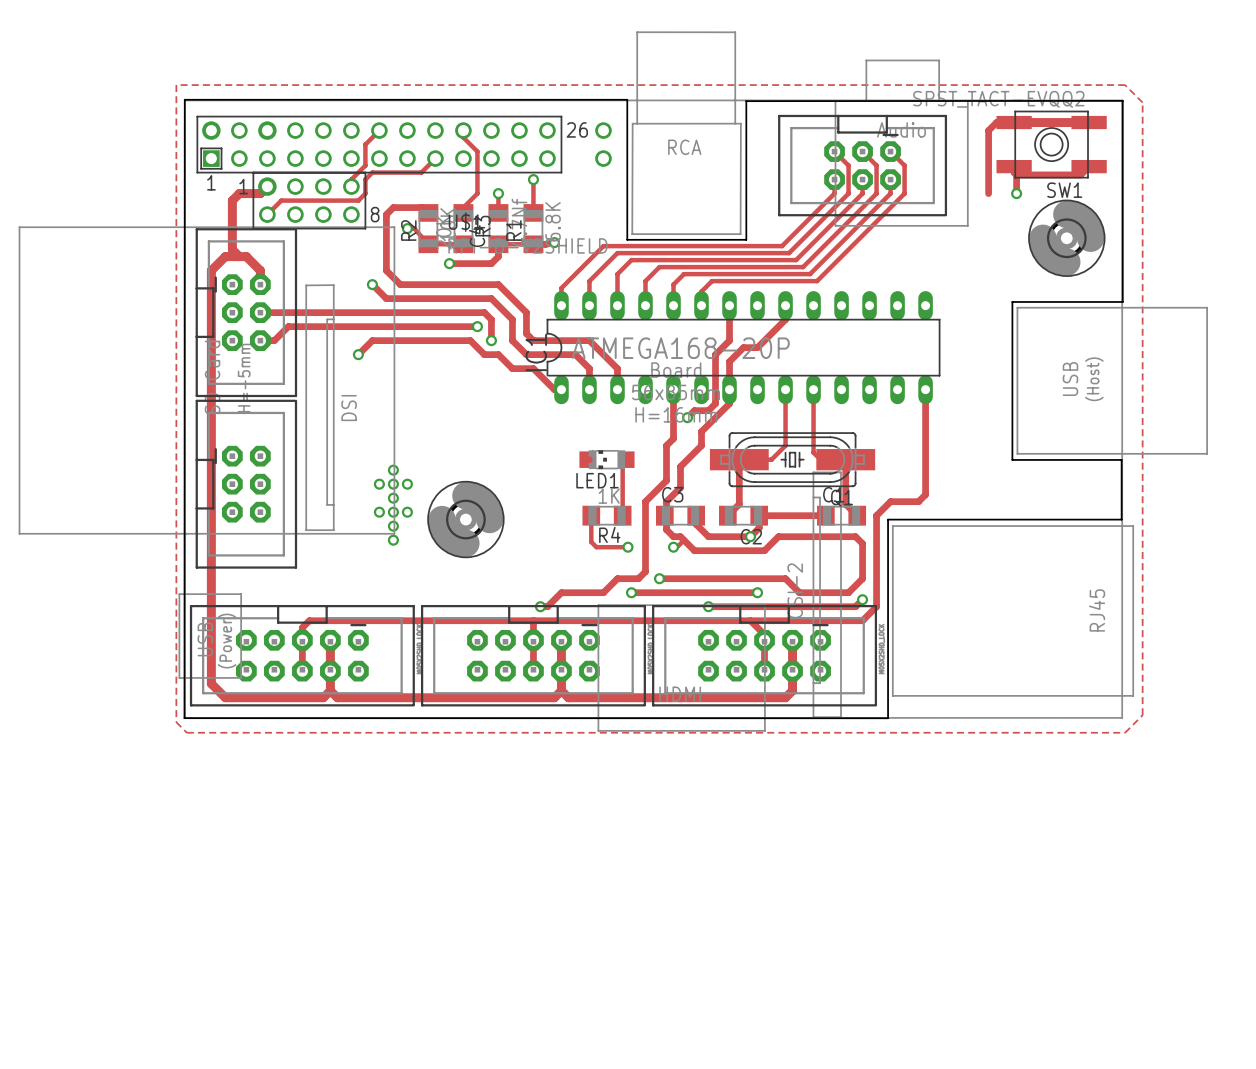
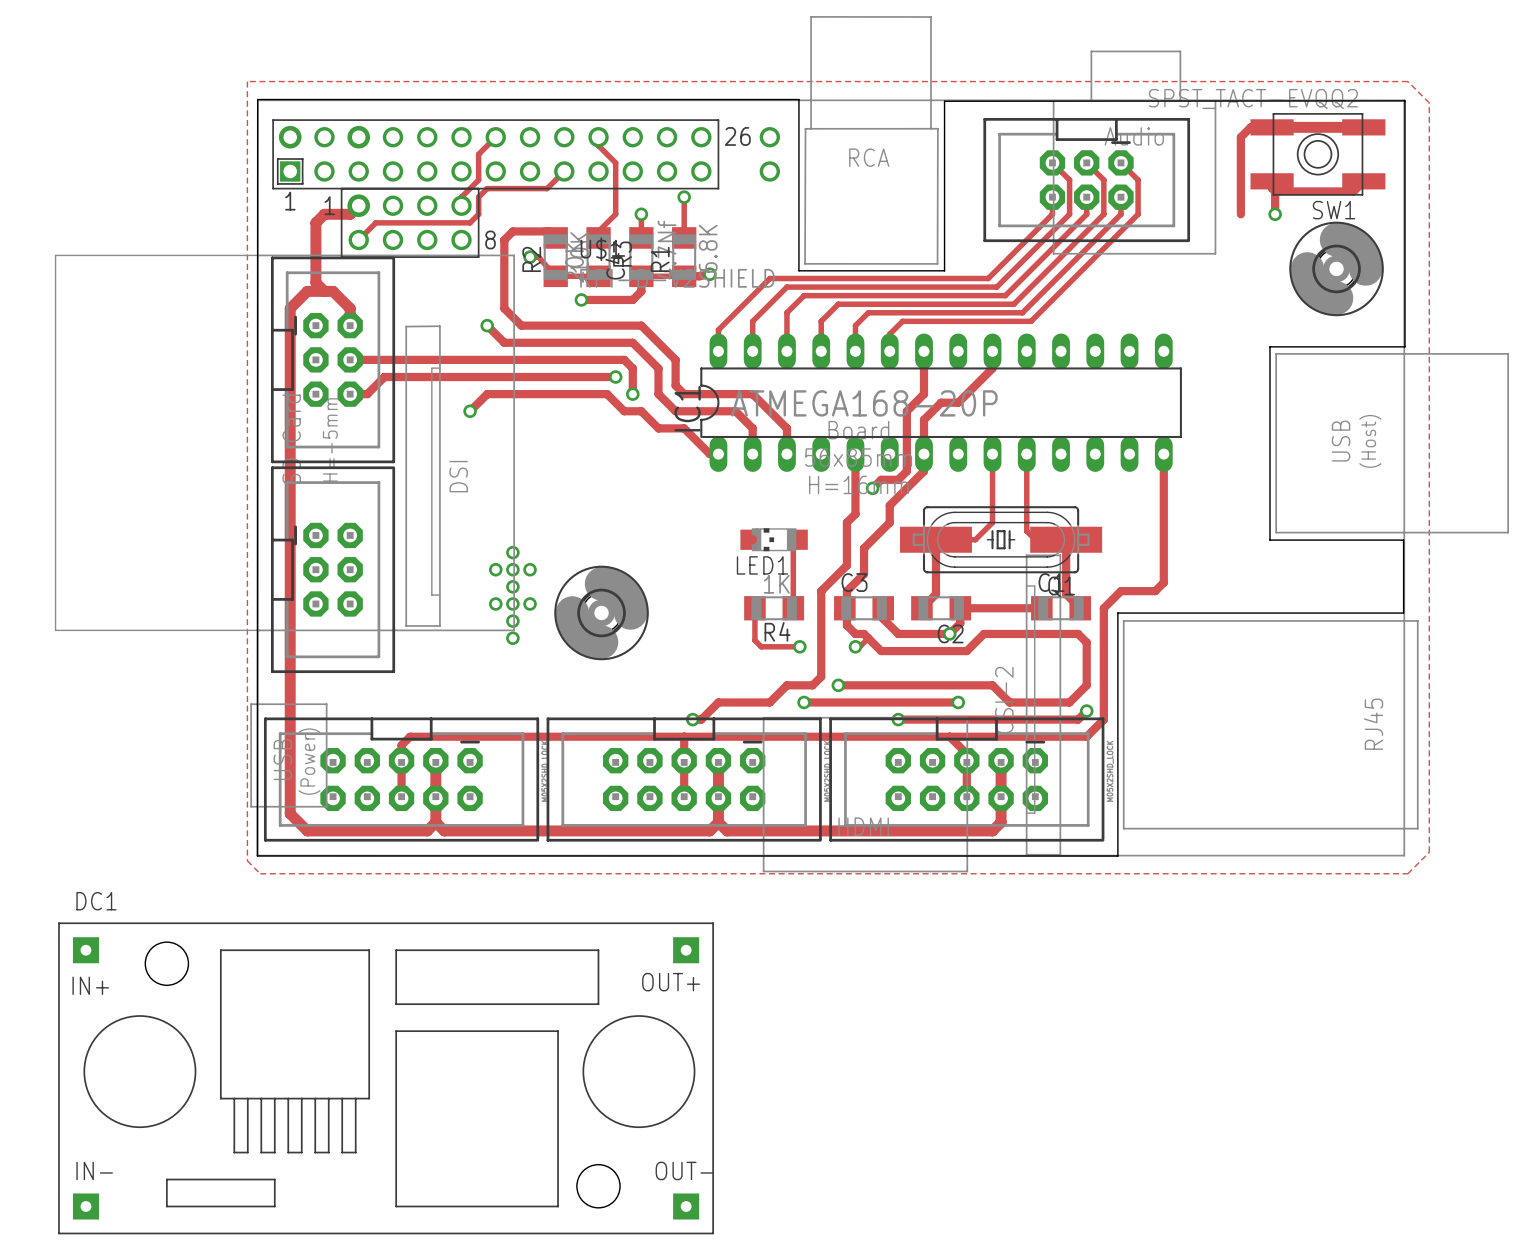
DC1: none -> (386, 1078)

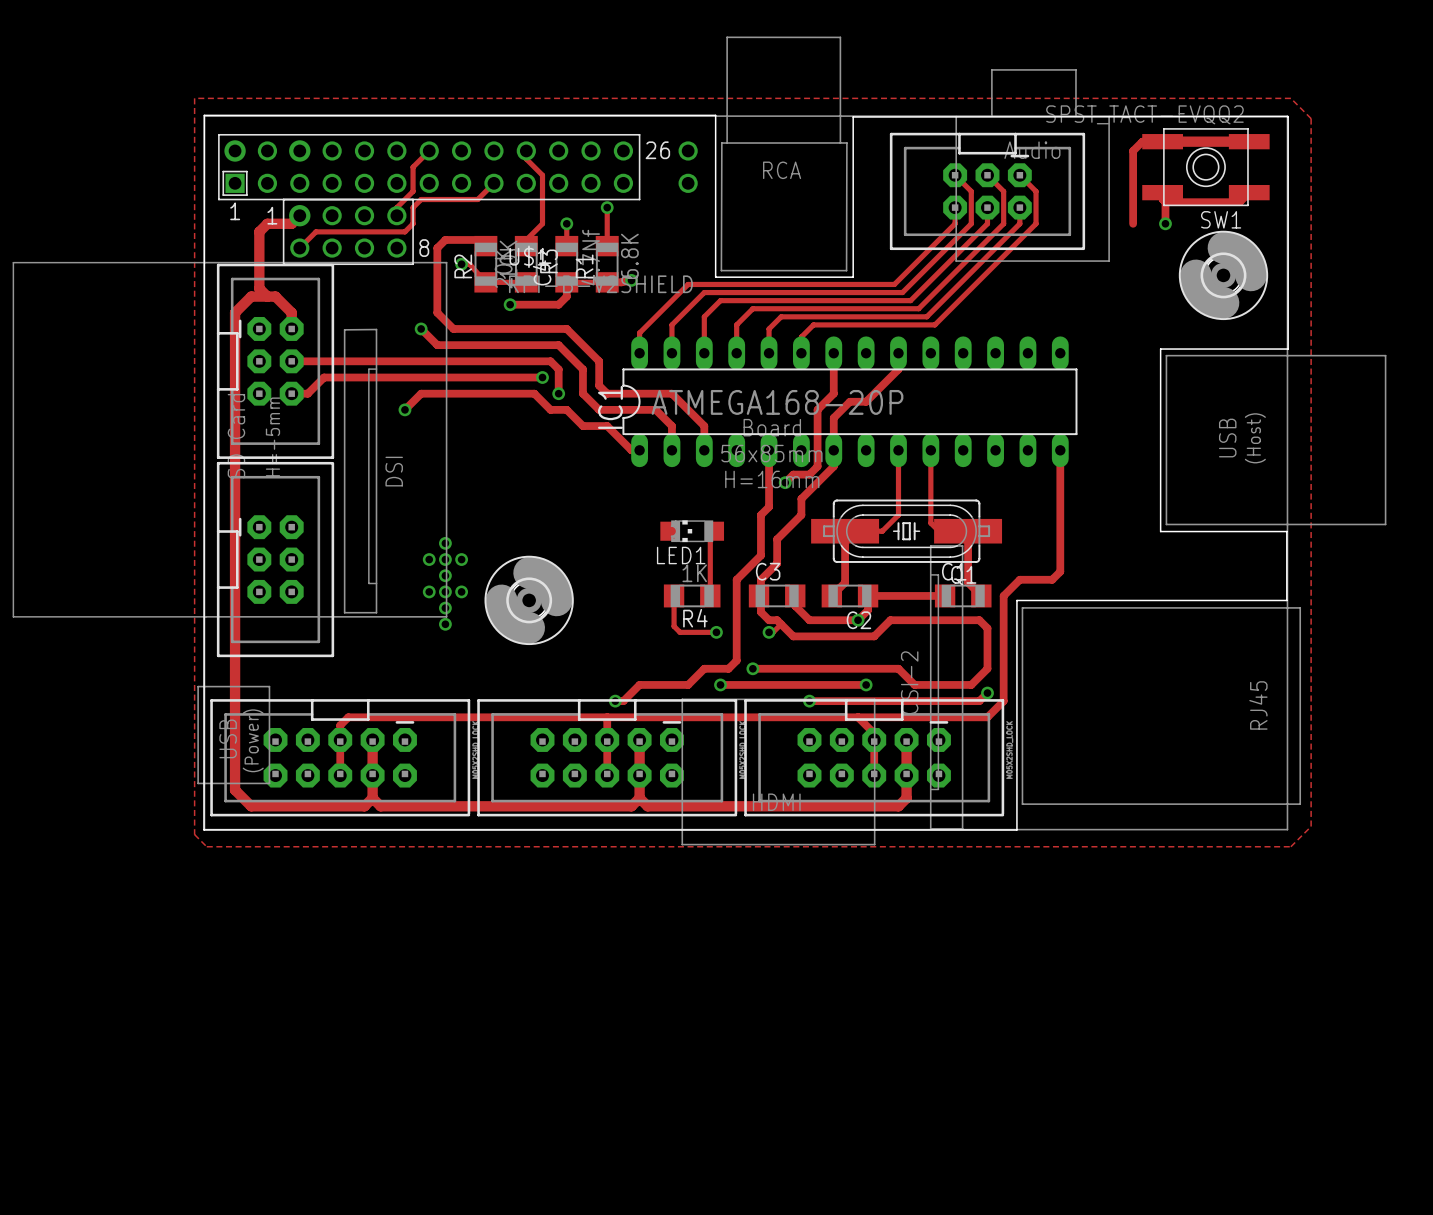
DC1: (386, 1078) -> none

